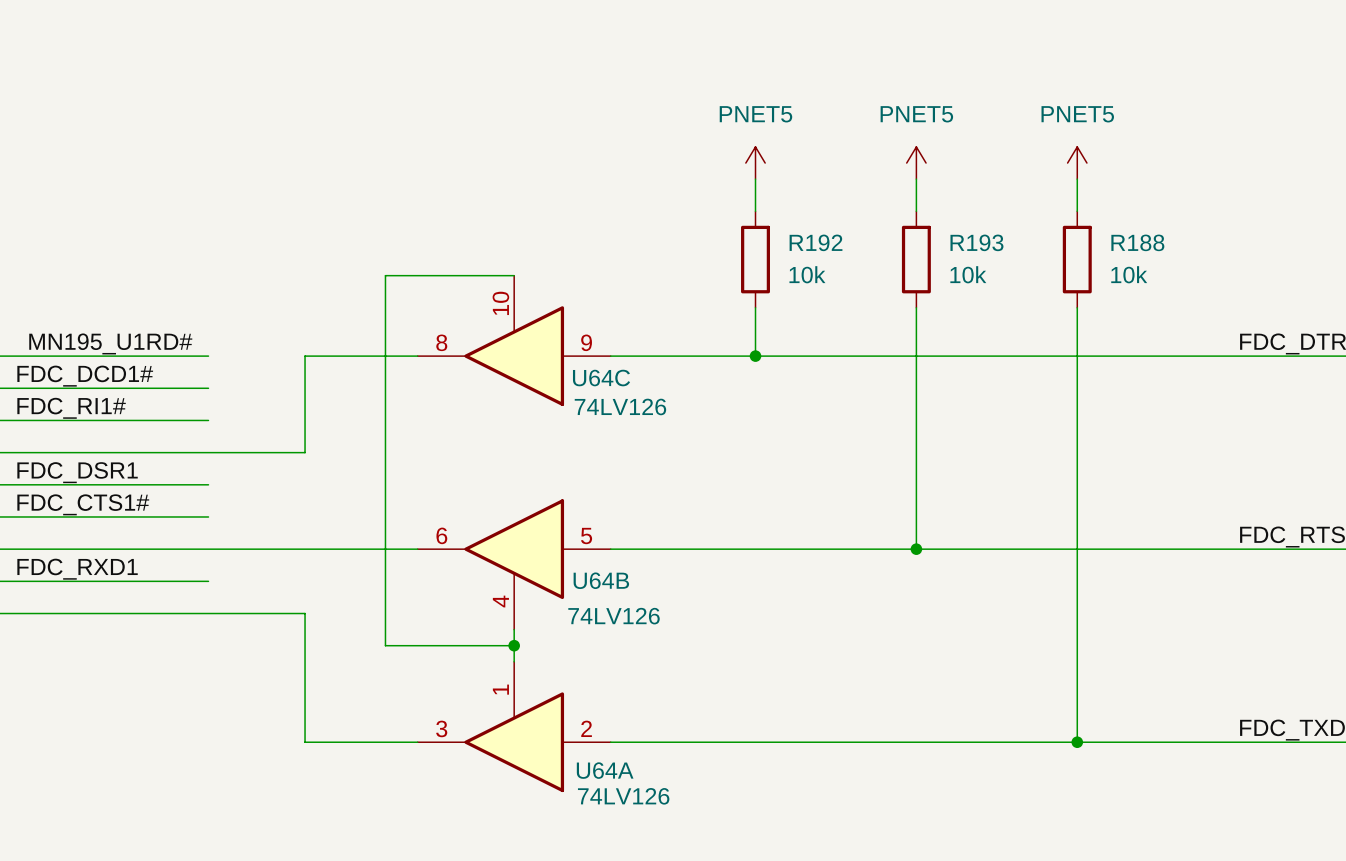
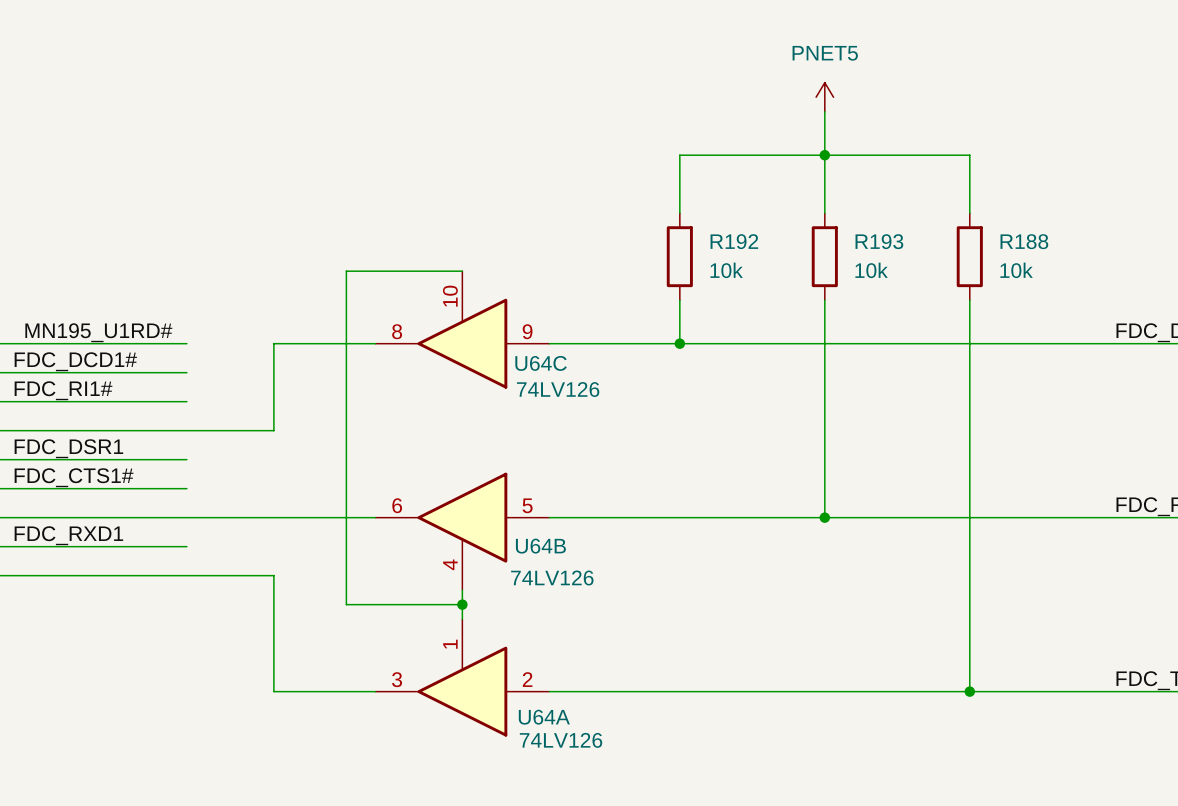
wire: none -> (824, 111) (824, 184)
junction: none -> (824, 155)
power symbol: PNET5 (755, 163) -> none
power symbol position: PNET5 (916, 163) -> PNET5 (824, 97)
power symbol: PNET5 (1077, 163) -> none
wire: none -> (679, 184) (679, 155) (969, 155) (969, 184)

